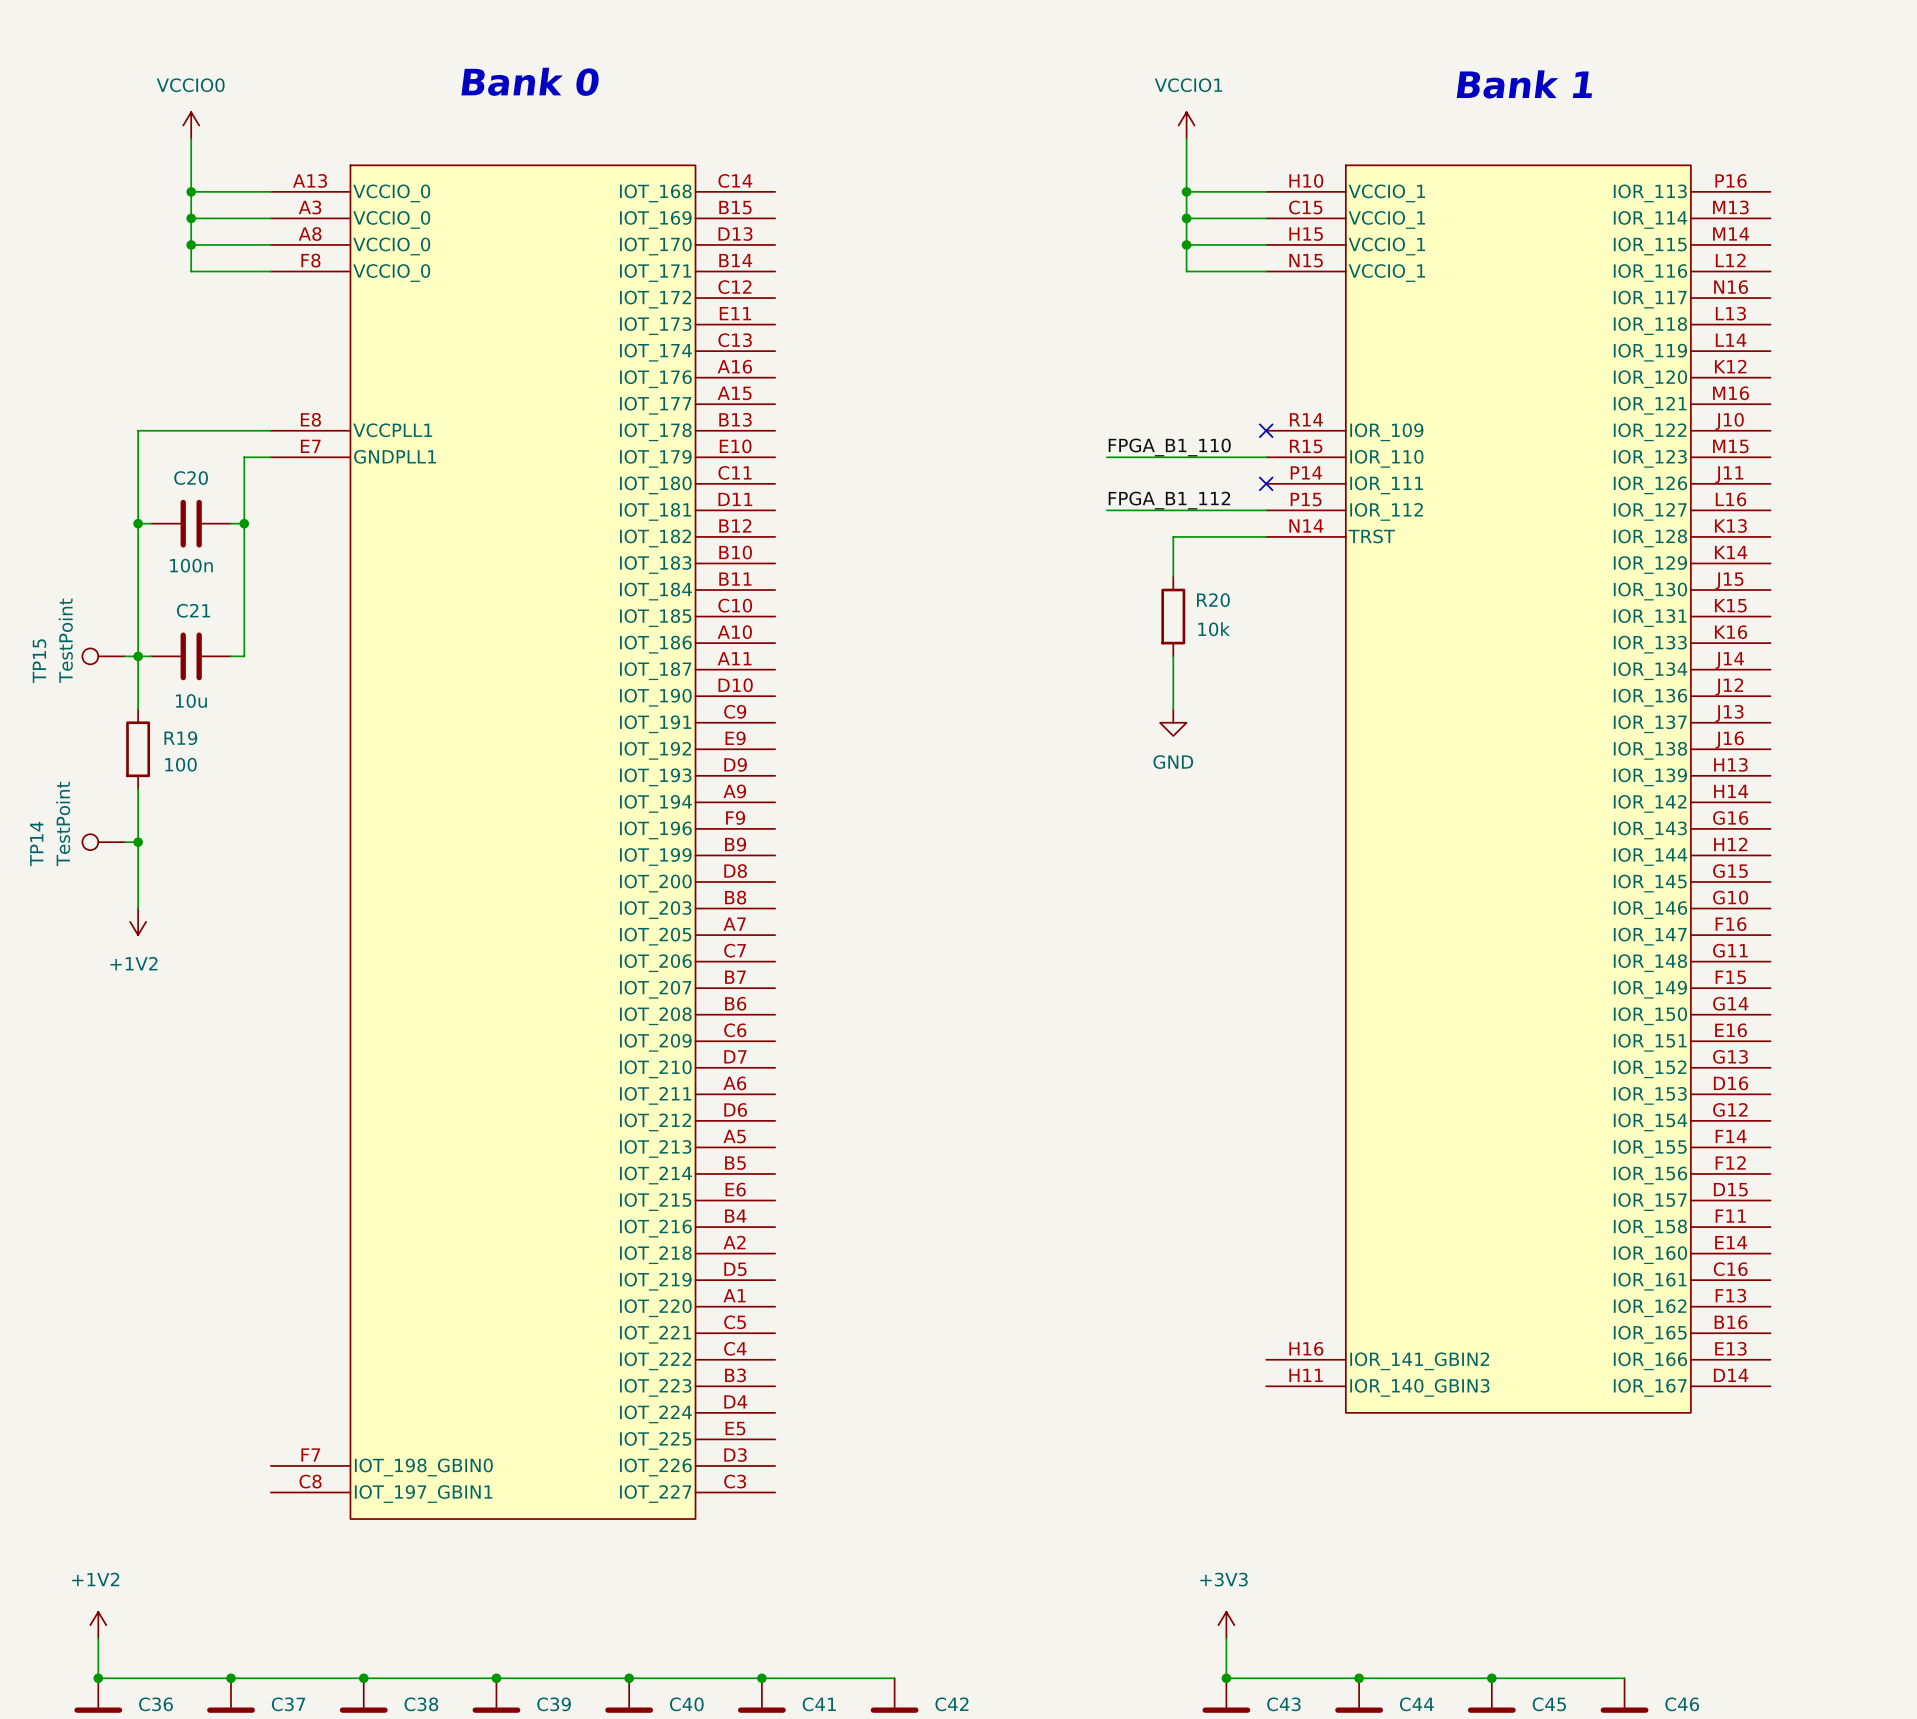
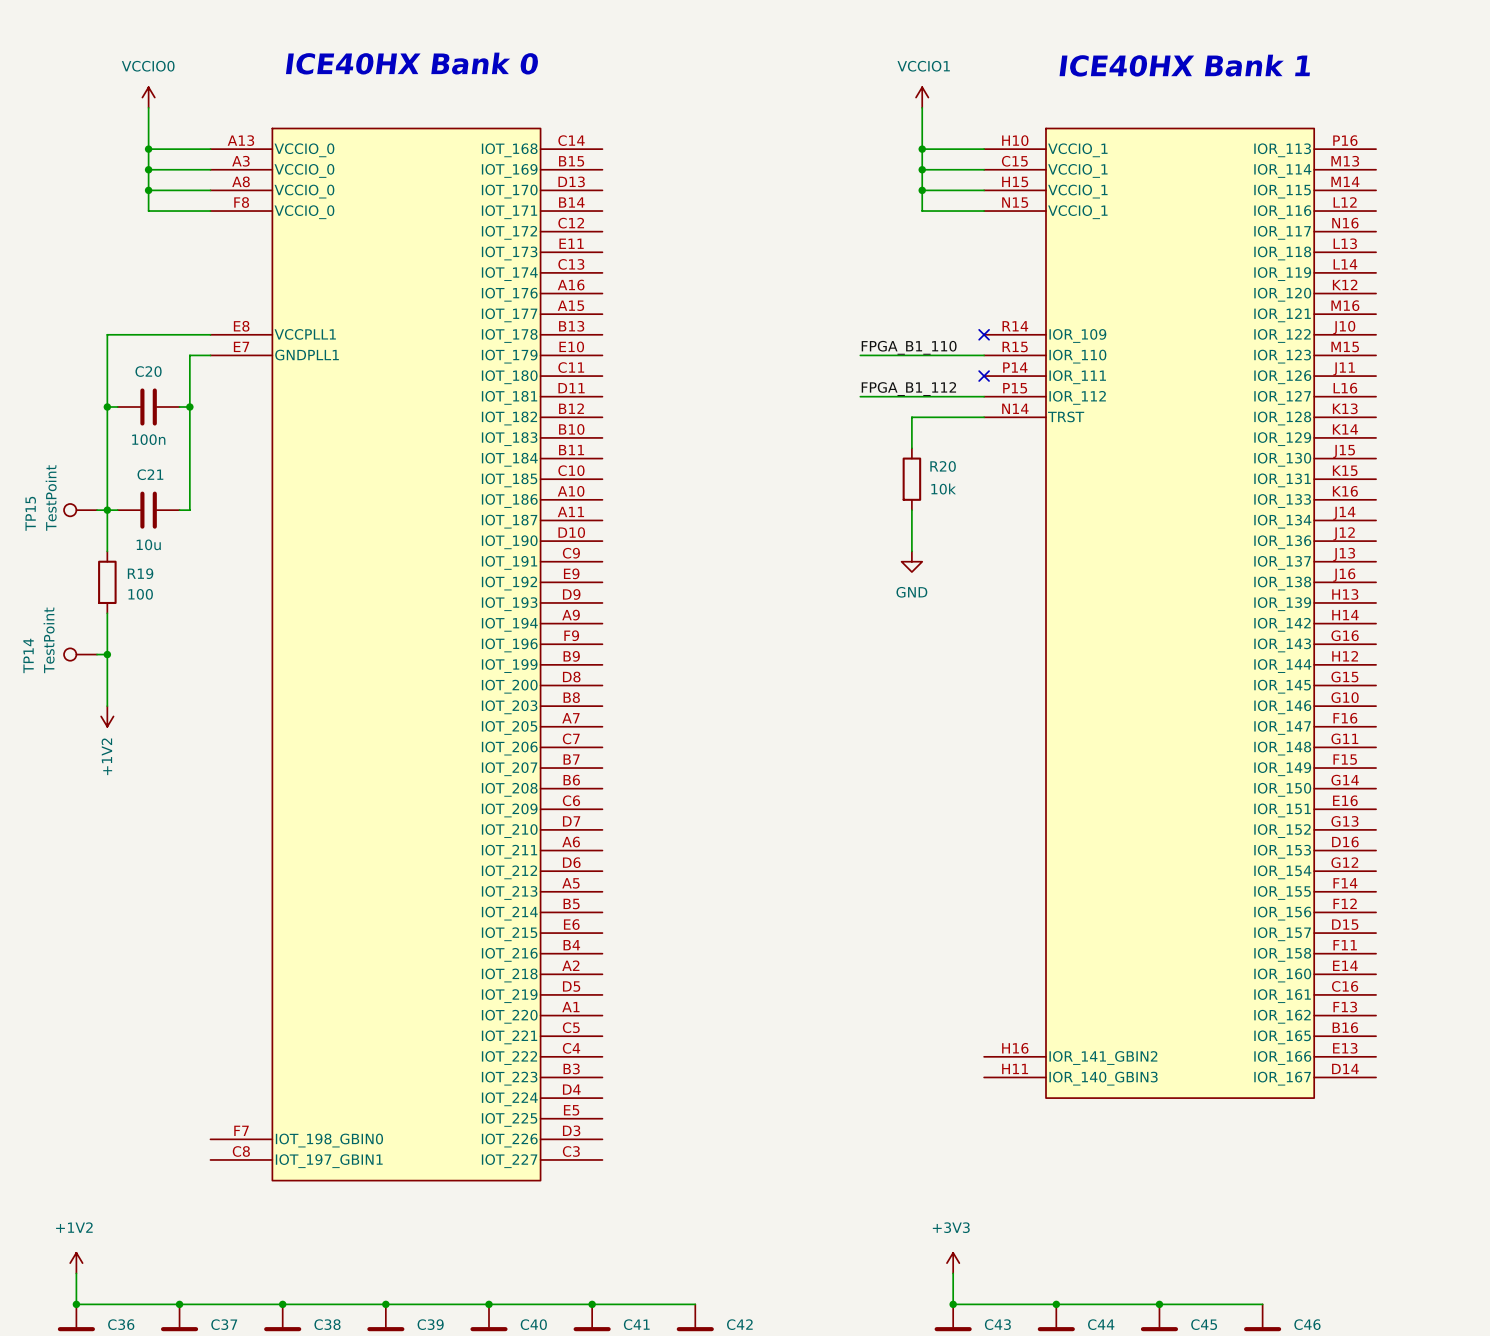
text: Bank 0 (530, 81) -> ICE40HX Bank 0 (412, 63)
text: Bank 1 (1524, 84) -> ICE40HX Bank 1 (1184, 65)
power symbol text rotation: 0° (133, 963) -> 90° counterclockwise (106, 756)

